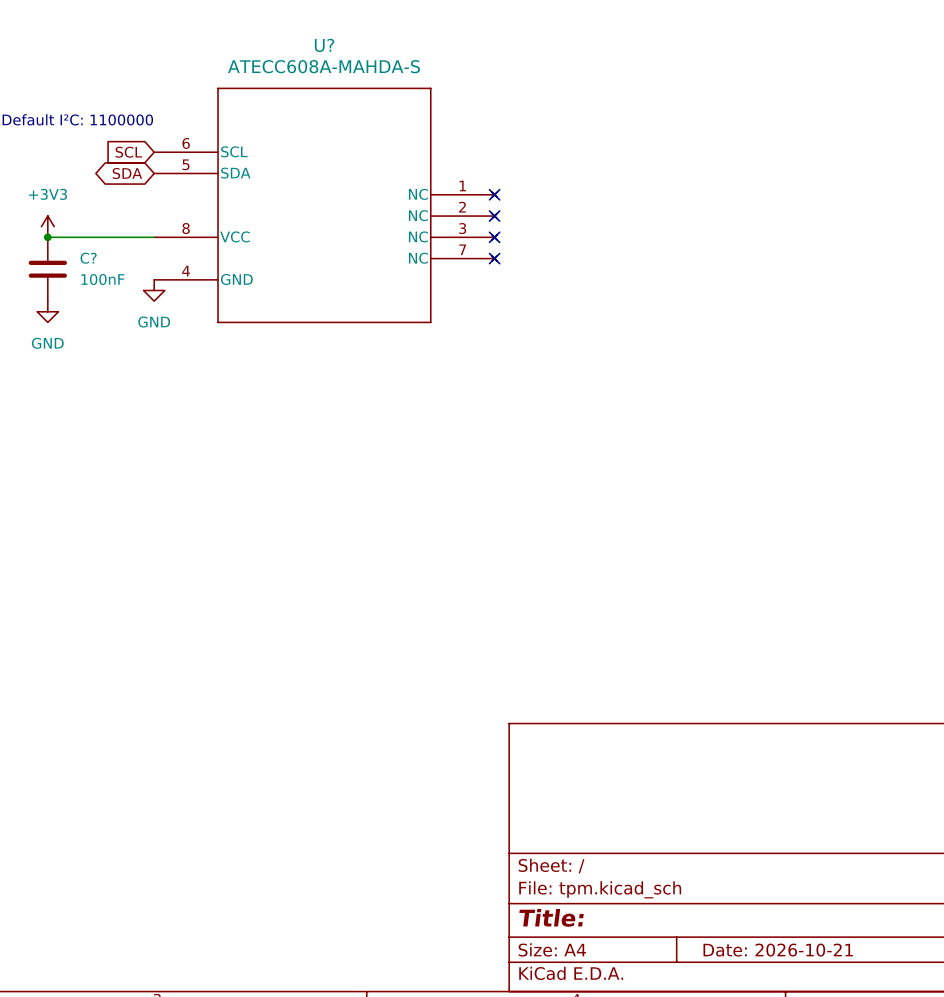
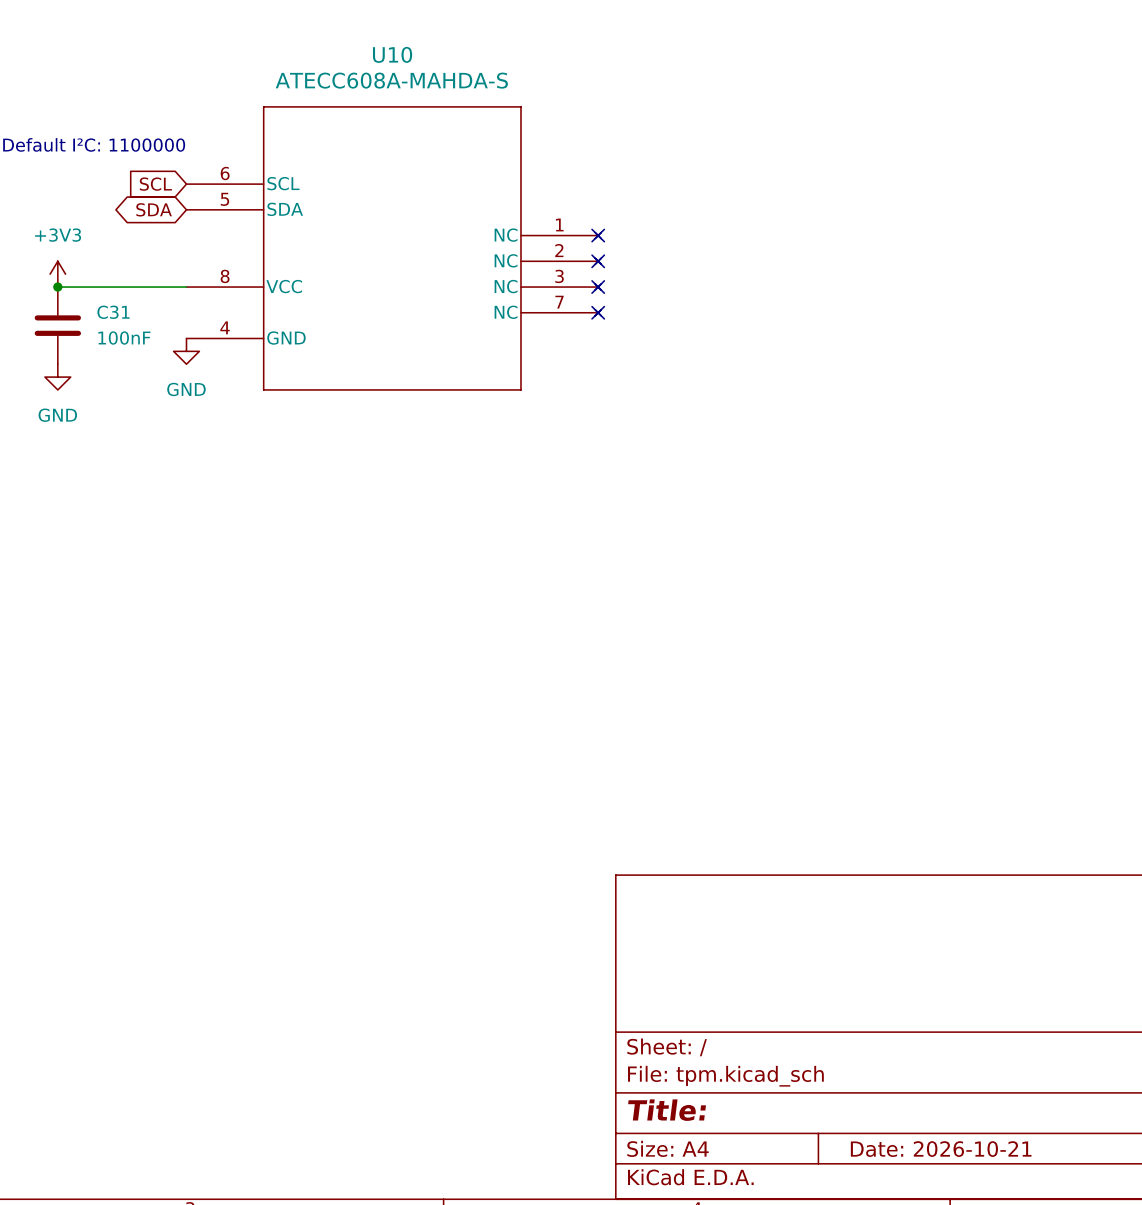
U? name: U? (324, 45) -> U10 (392, 54)
C? name: C? (88, 258) -> C31 (113, 312)

